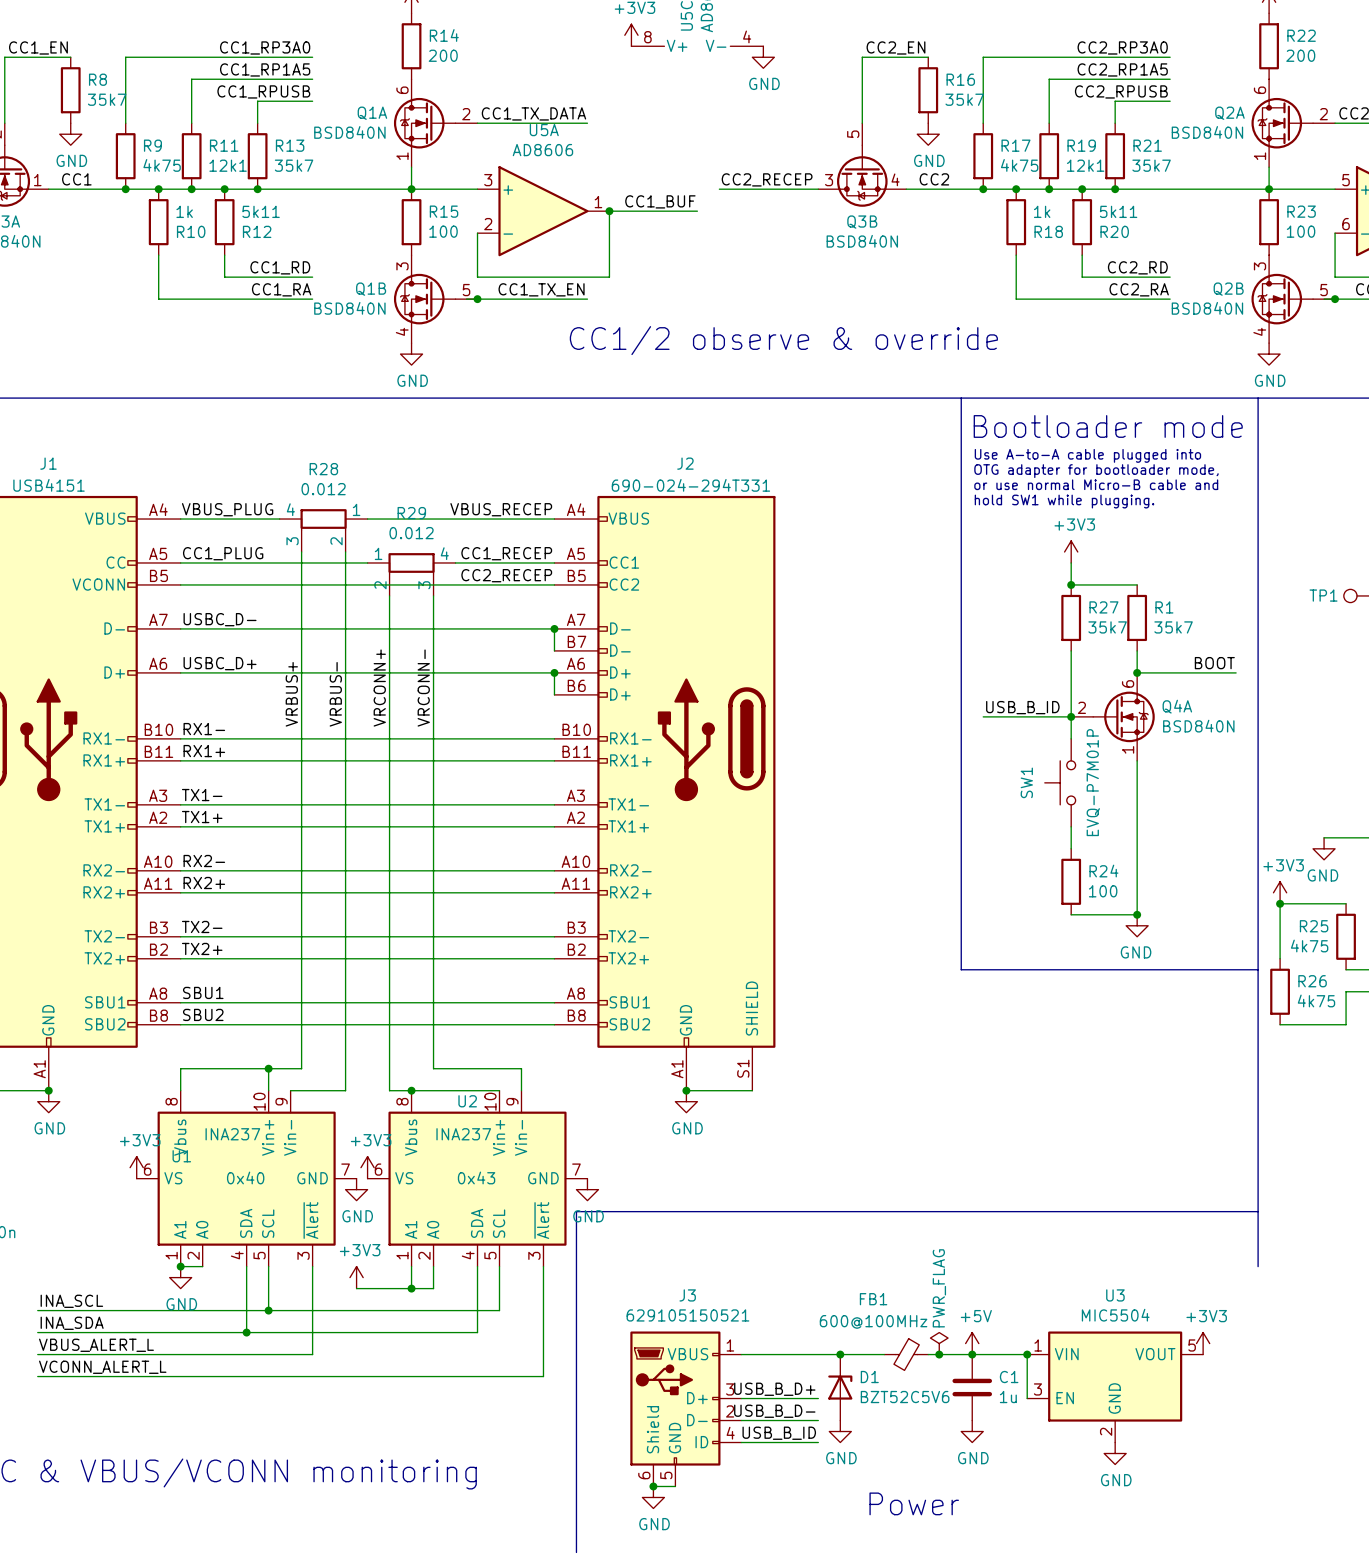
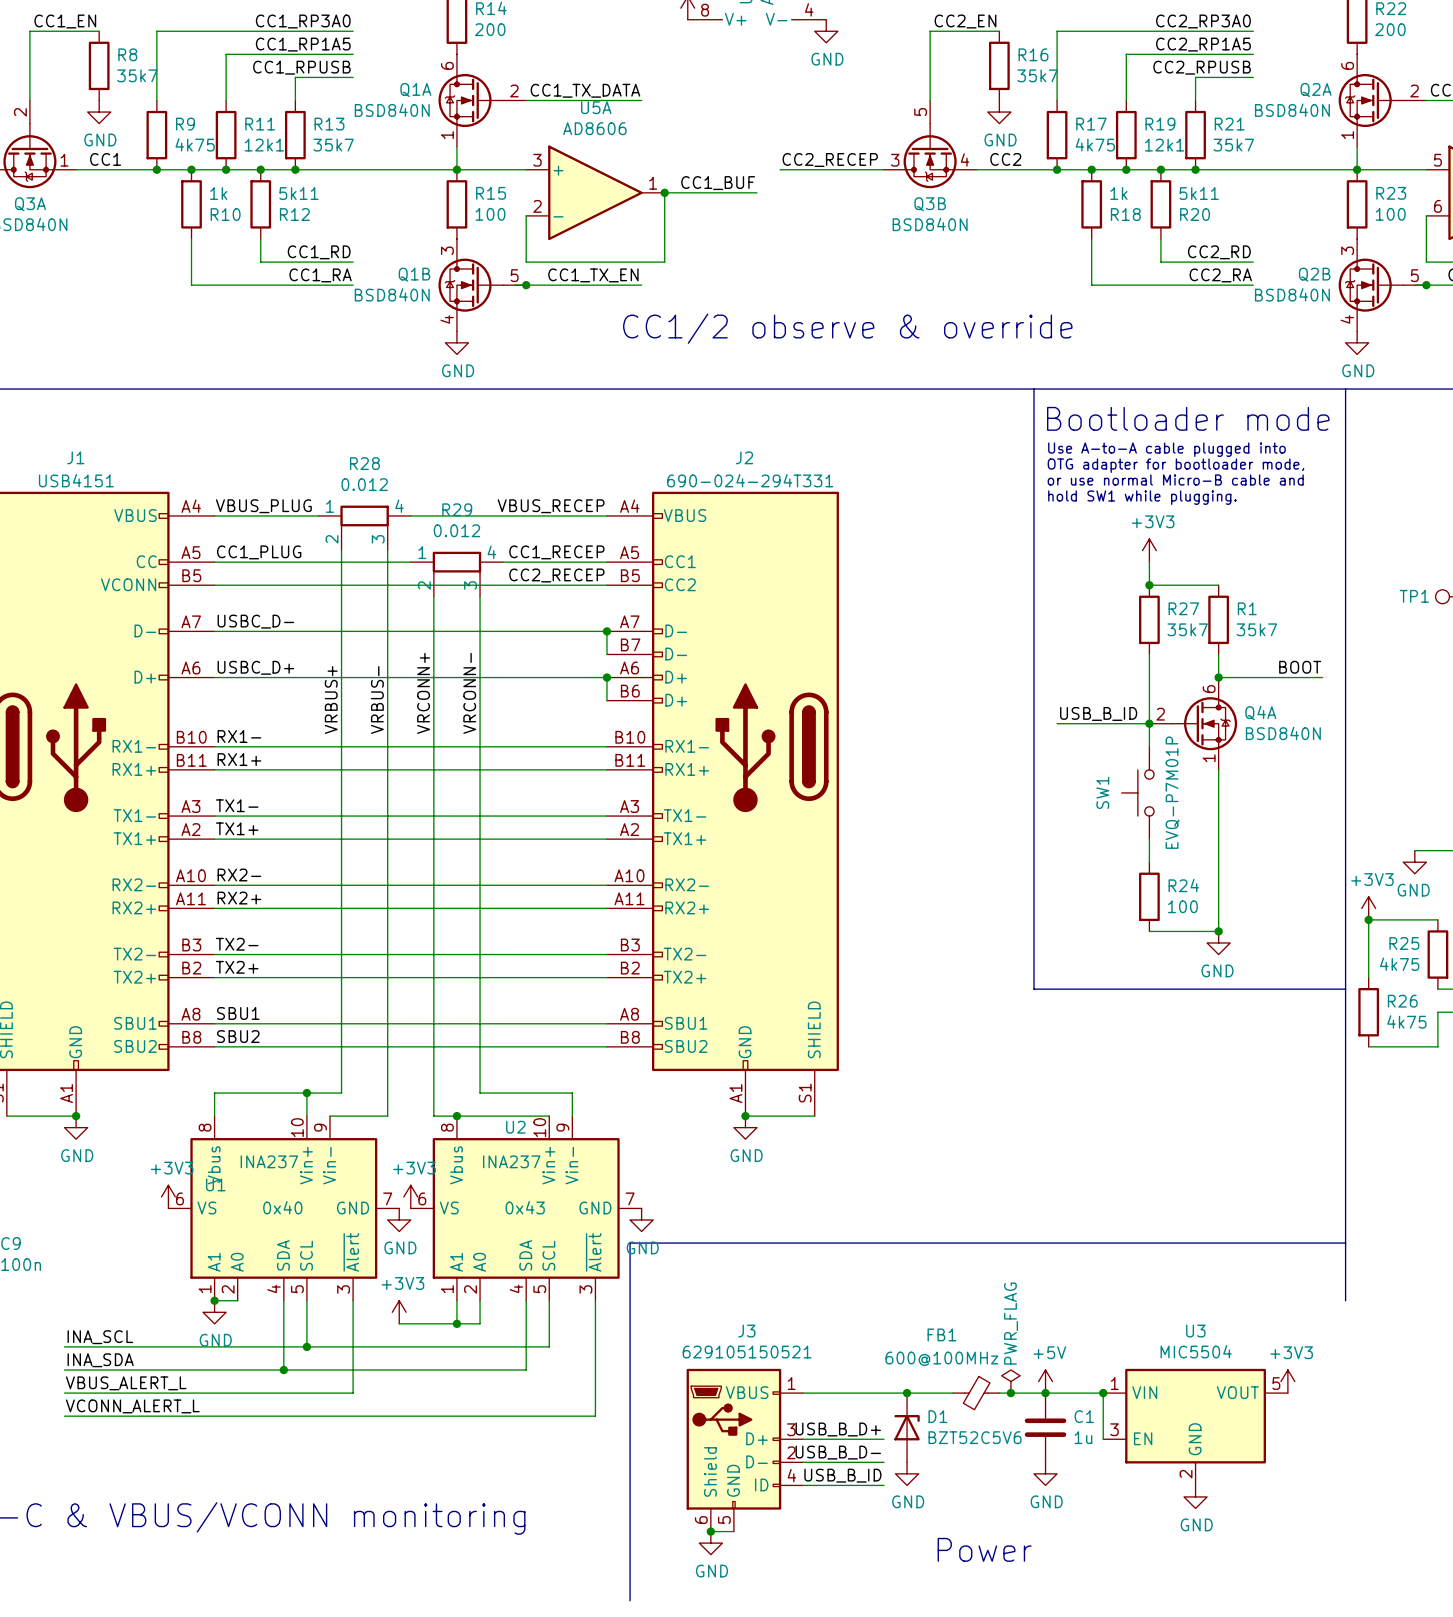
R28 flip: as is (323, 519) -> left-right (364, 516)

